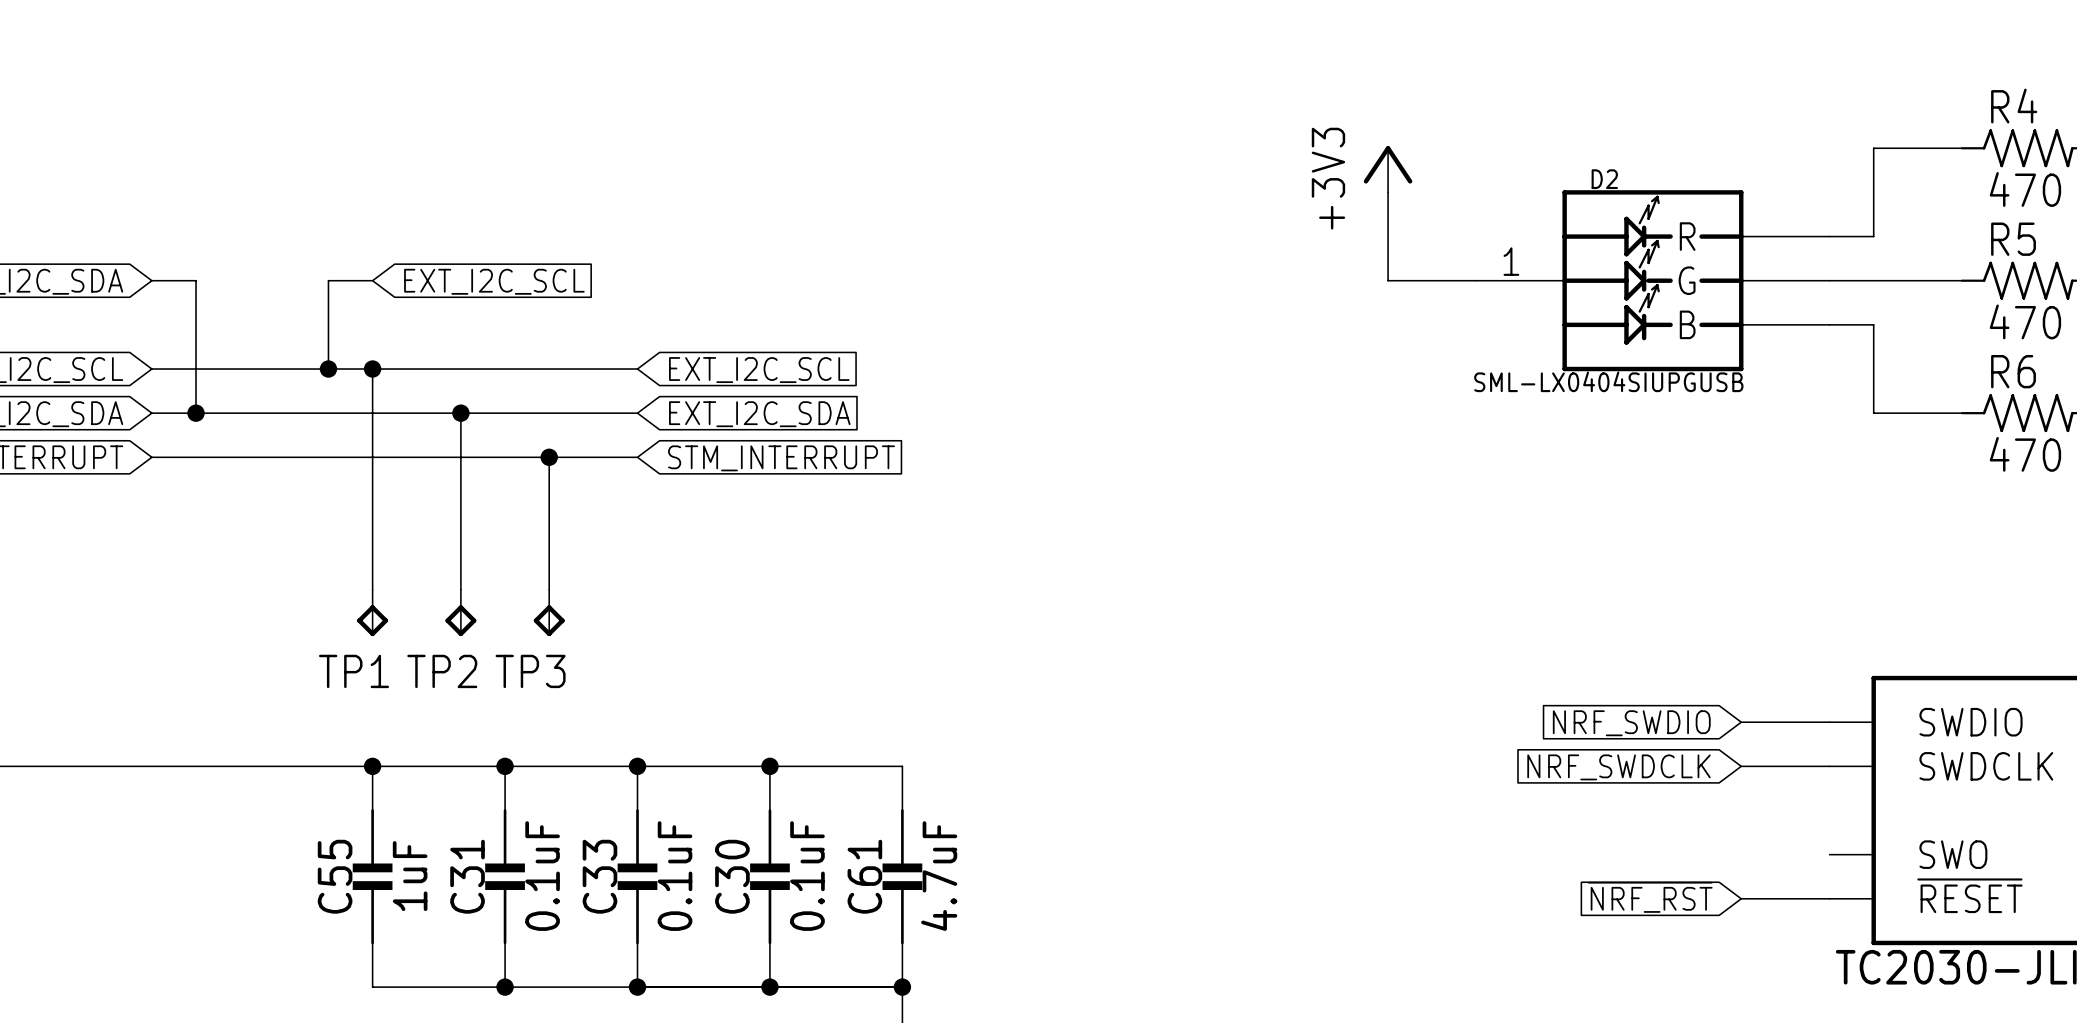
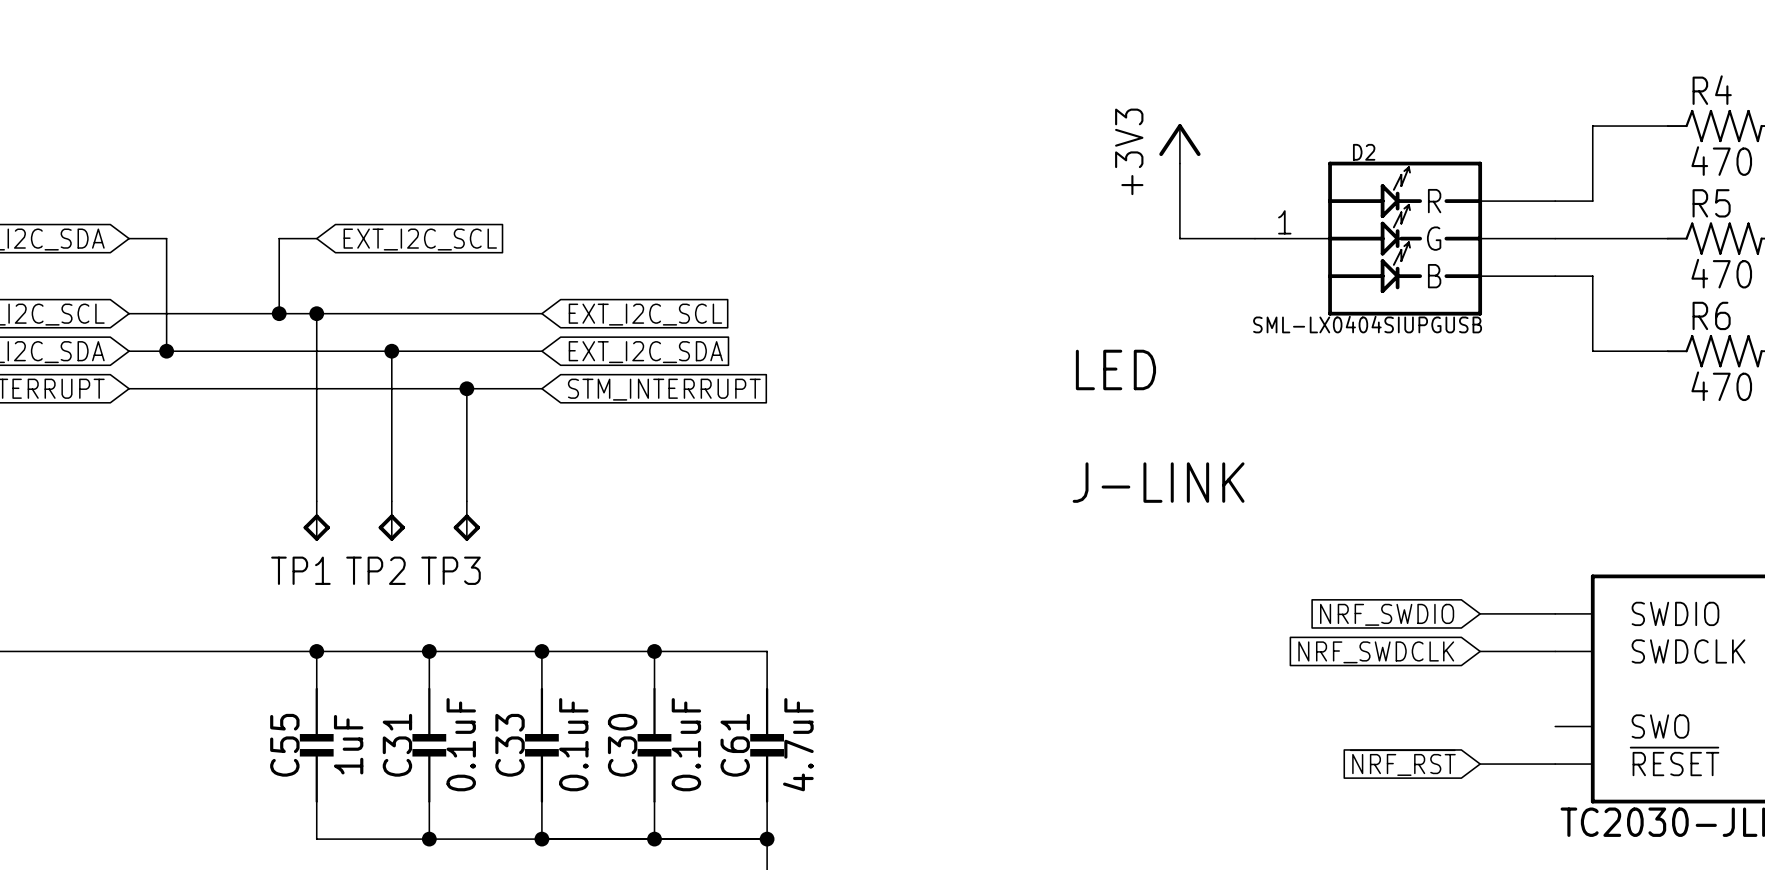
text: none -> LED (1115, 369)
text: none -> J-LINK (1158, 482)

